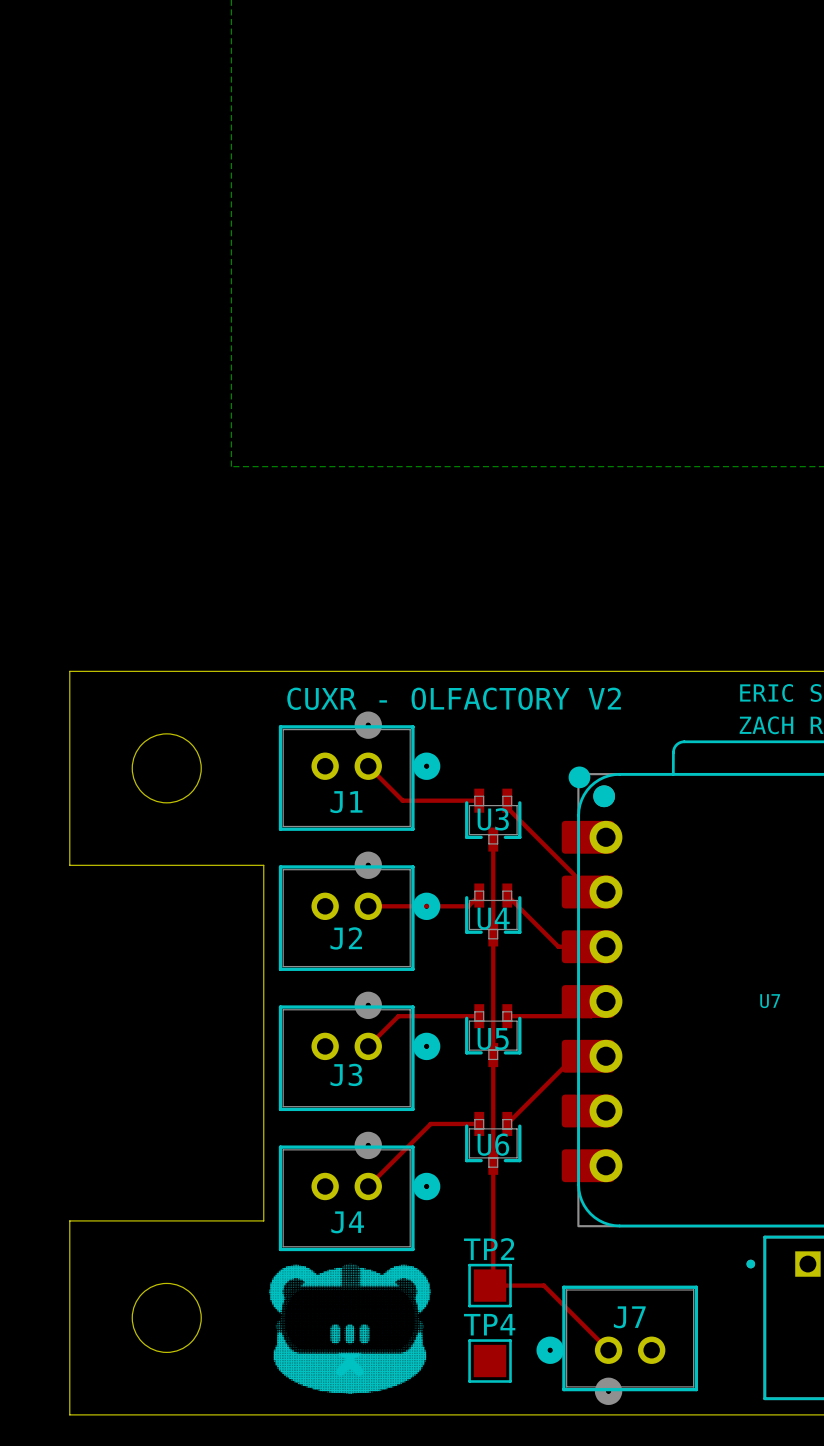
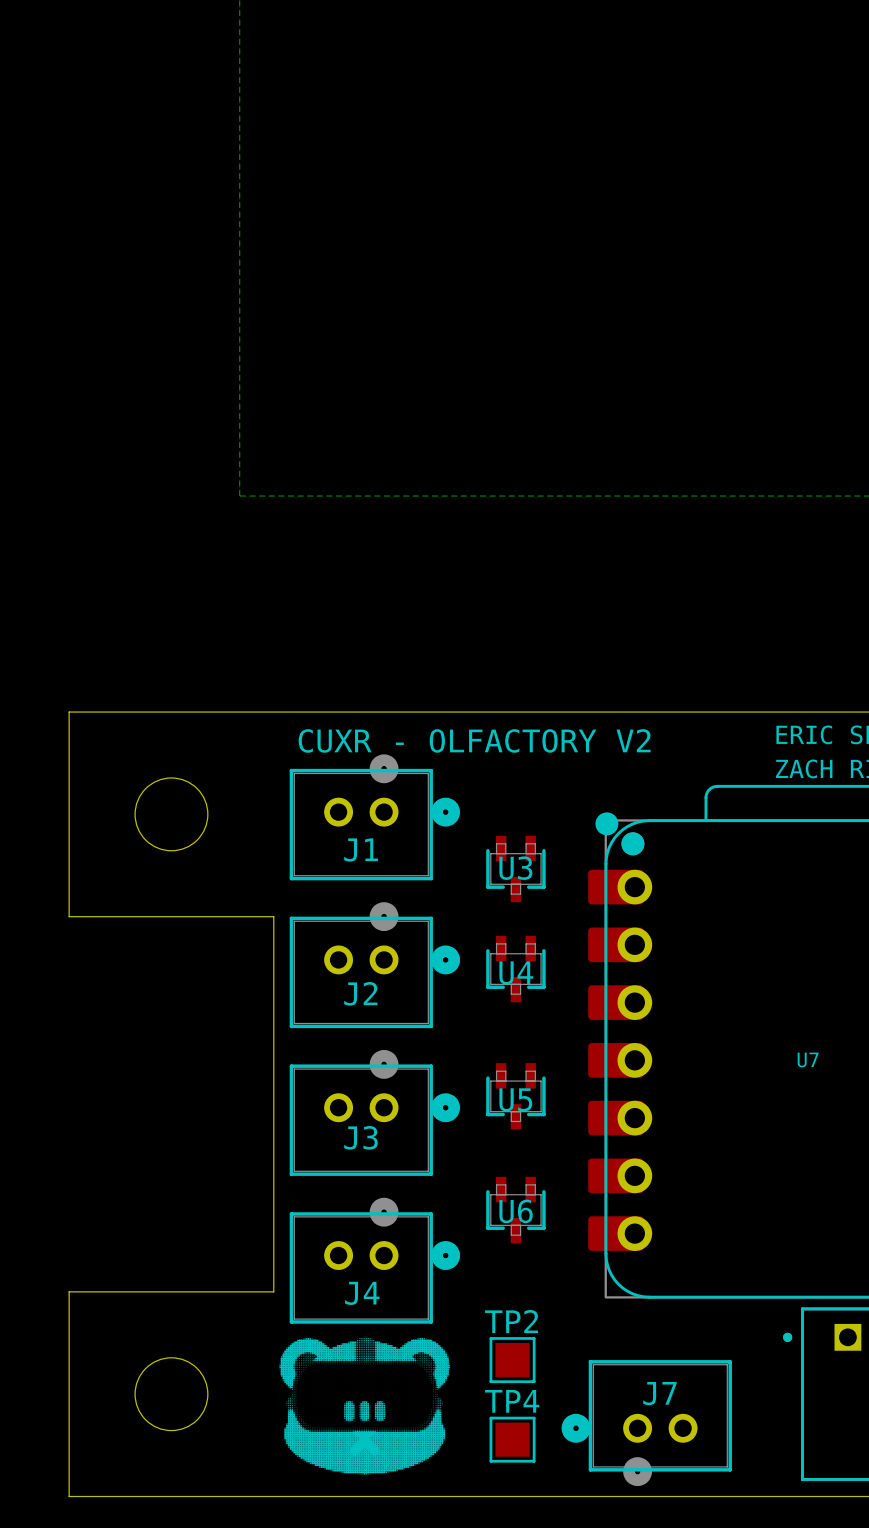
top track: (368, 766) (402, 800) (479, 800) -> none
top track: (507, 800) (507, 807) (591, 892) (605, 892) -> none
top track: (493, 839) (493, 1282) (490, 1285) (543, 1285) (608, 1350) -> none
top track: (479, 895) (468, 906) (368, 906) -> none
top track: (507, 895) (558, 946) (605, 946) -> none
top track: (605, 1001) (591, 1016) (507, 1016) -> none
top track: (479, 1016) (398, 1016) (368, 1046) -> none
top track: (605, 1056) (574, 1056) (507, 1123) -> none
top track: (479, 1123) (430, 1123) (368, 1186) -> none

